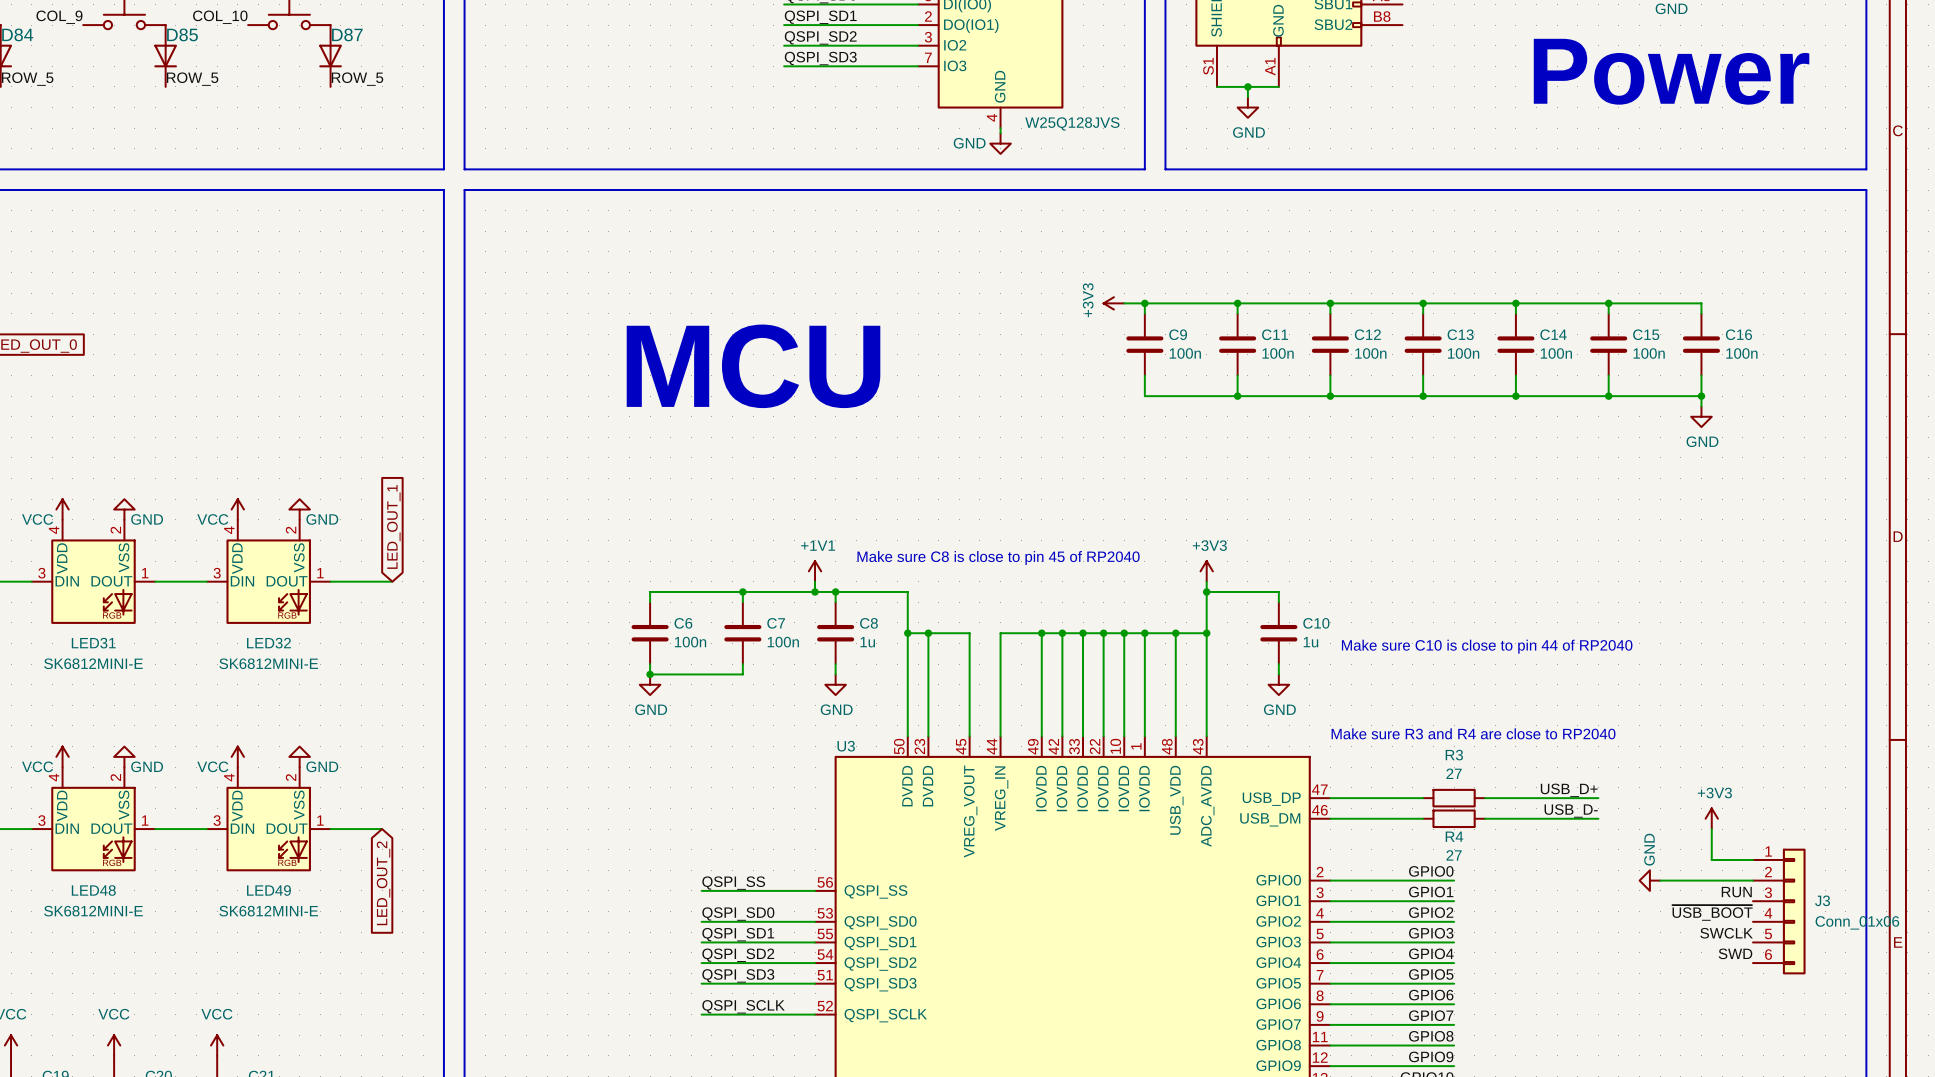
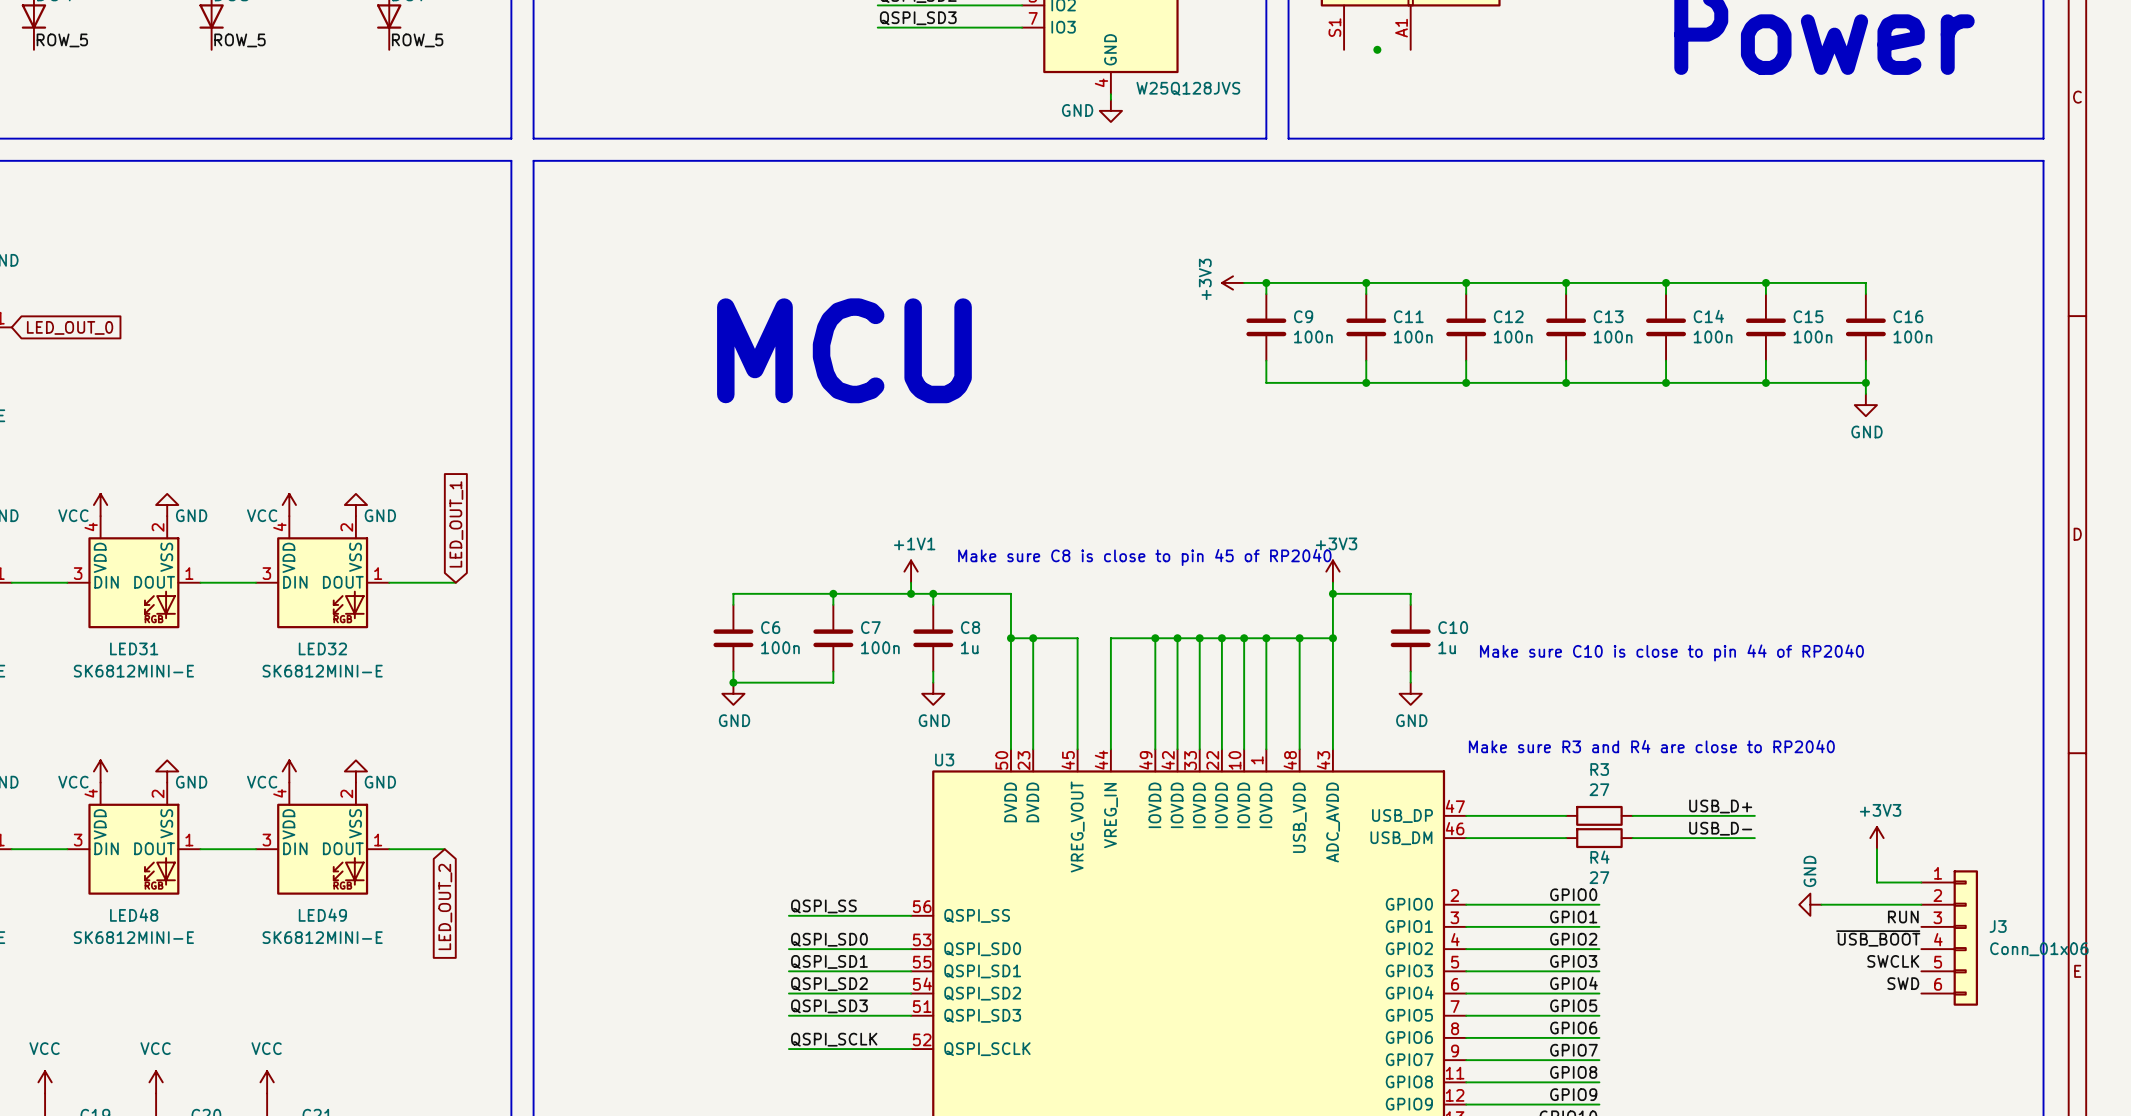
wire: (1217, 86) (1278, 86) -> none
wire: (1247, 86) (1247, 97) -> none
power symbol: GND (1247, 107) -> none

